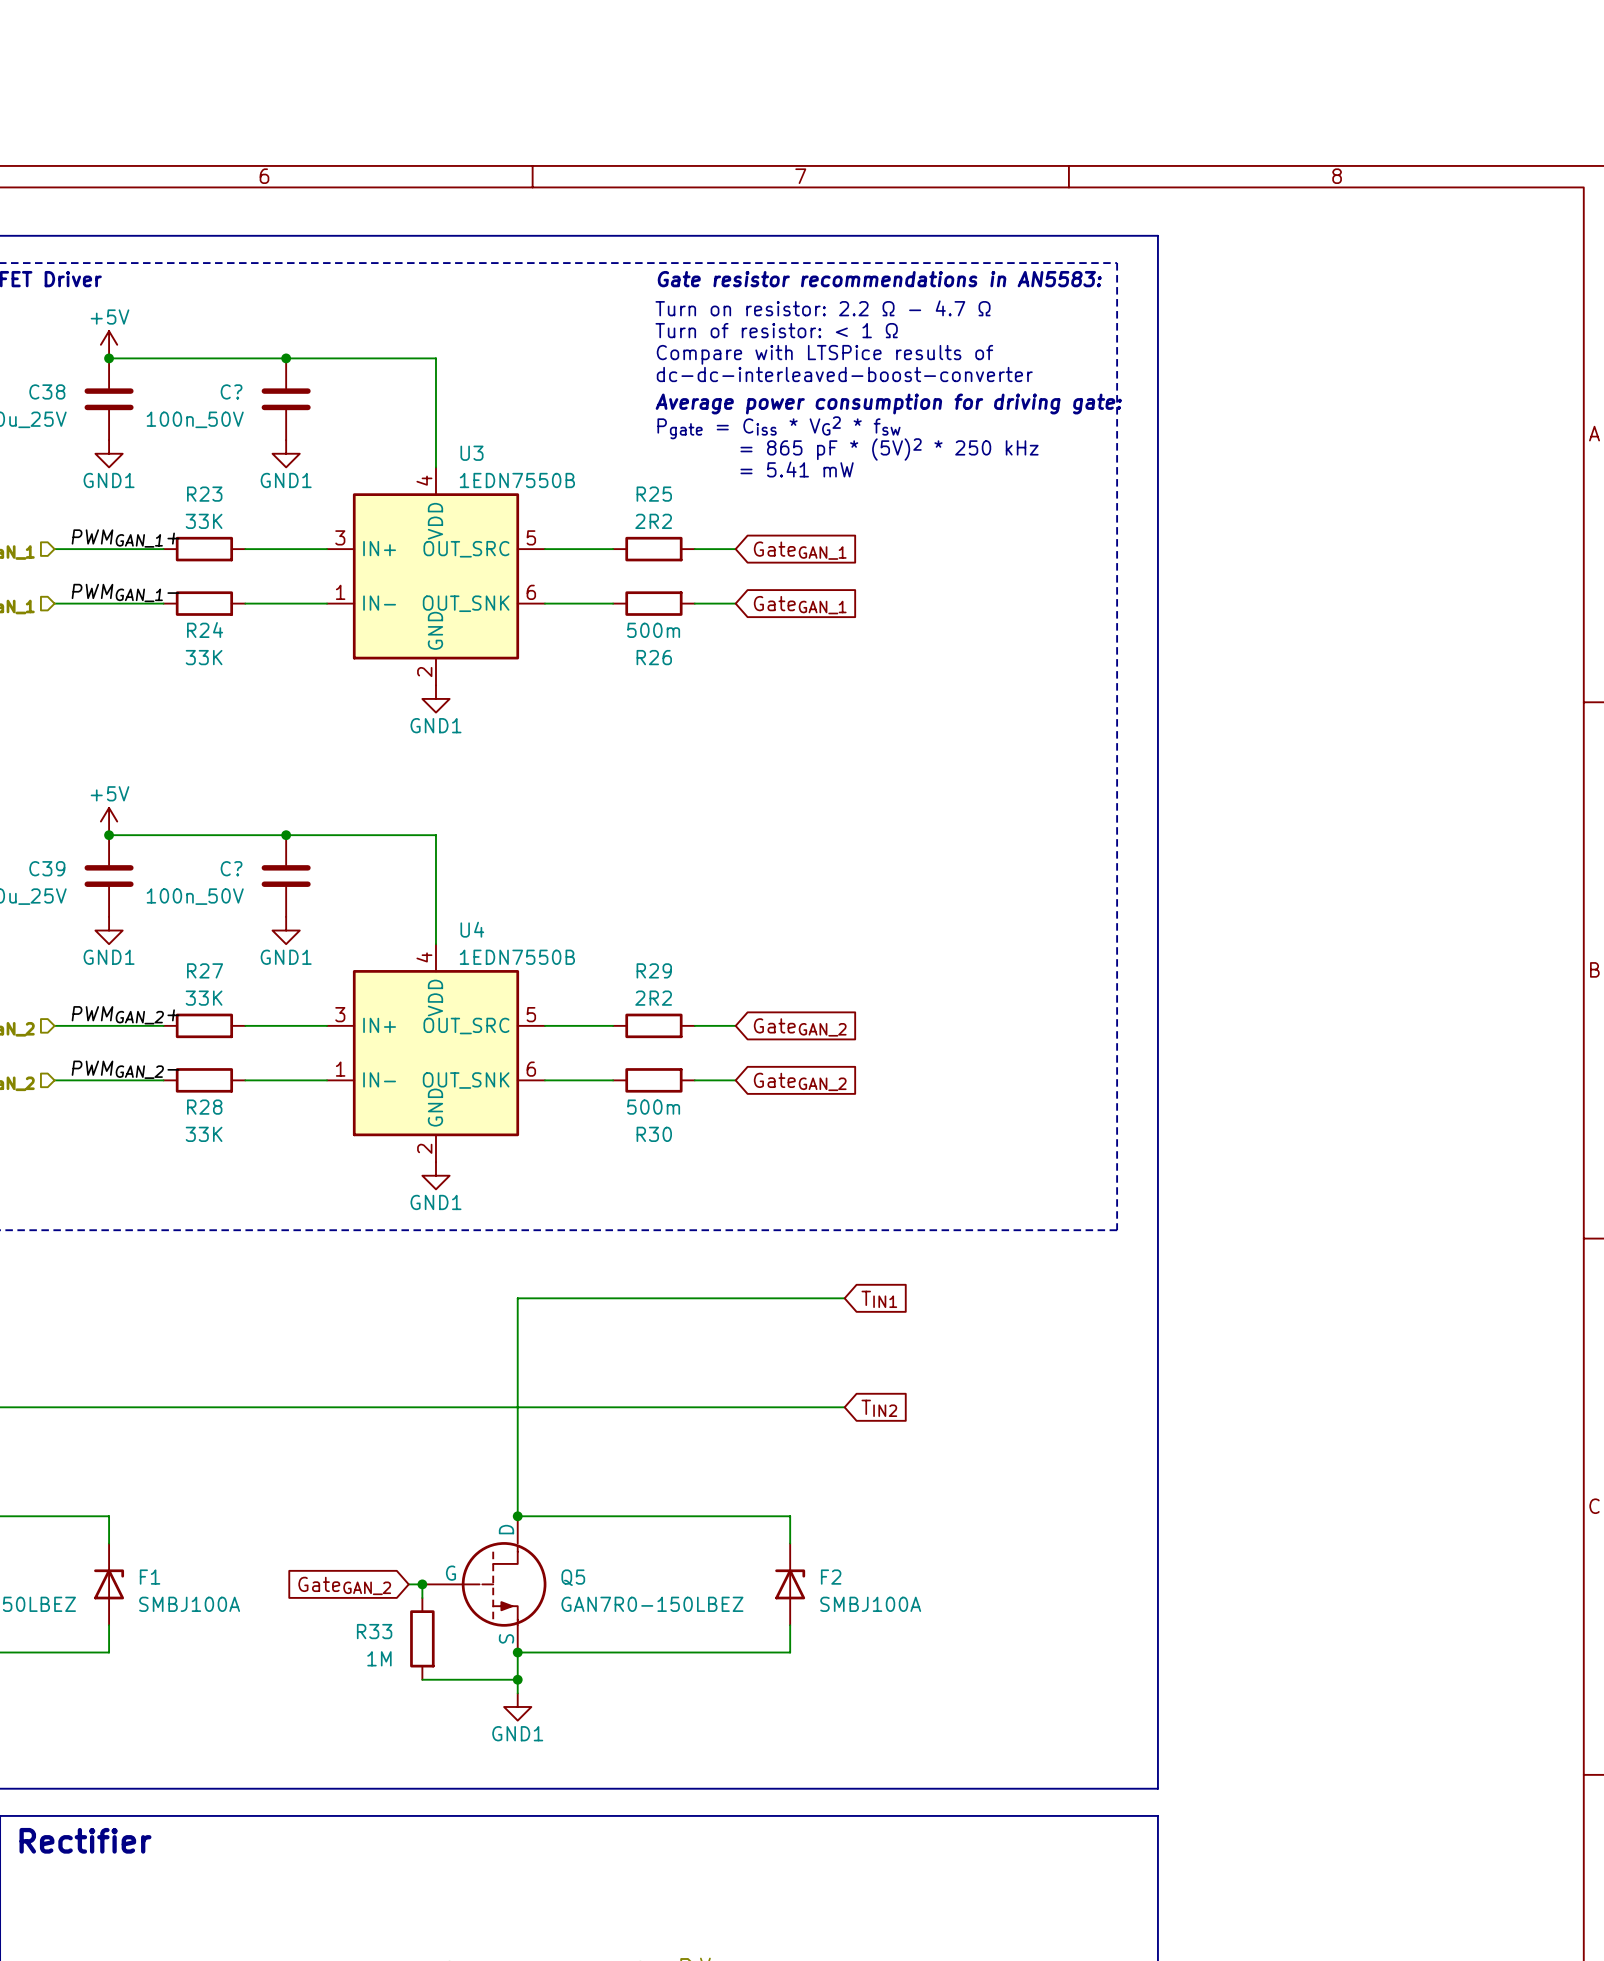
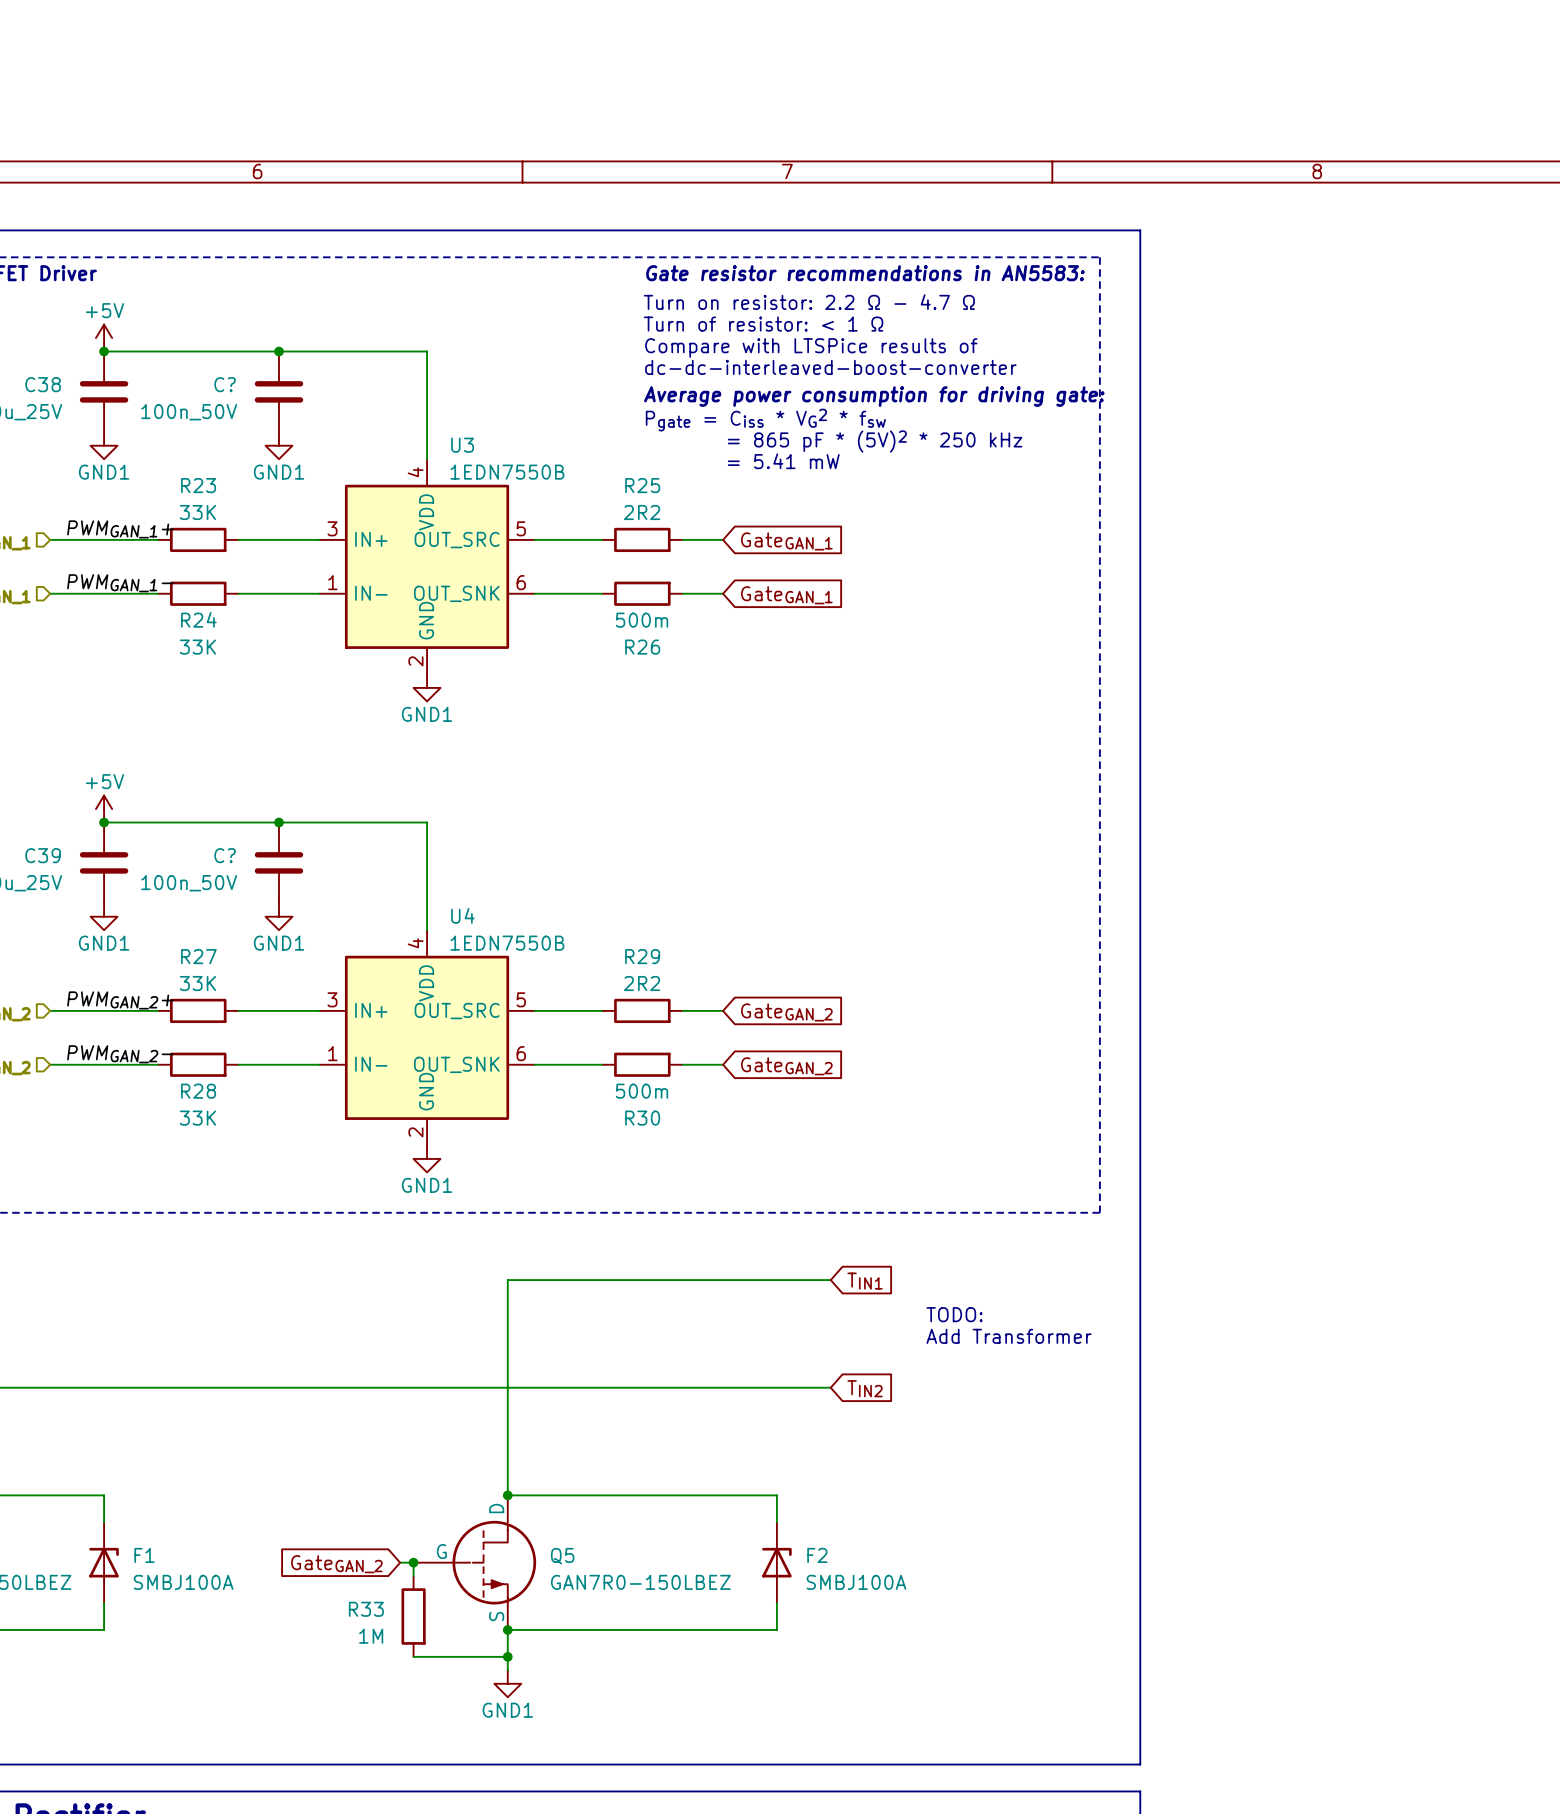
text: none -> TODO: (954, 1314)
text: none -> Add Transformer (1009, 1336)

